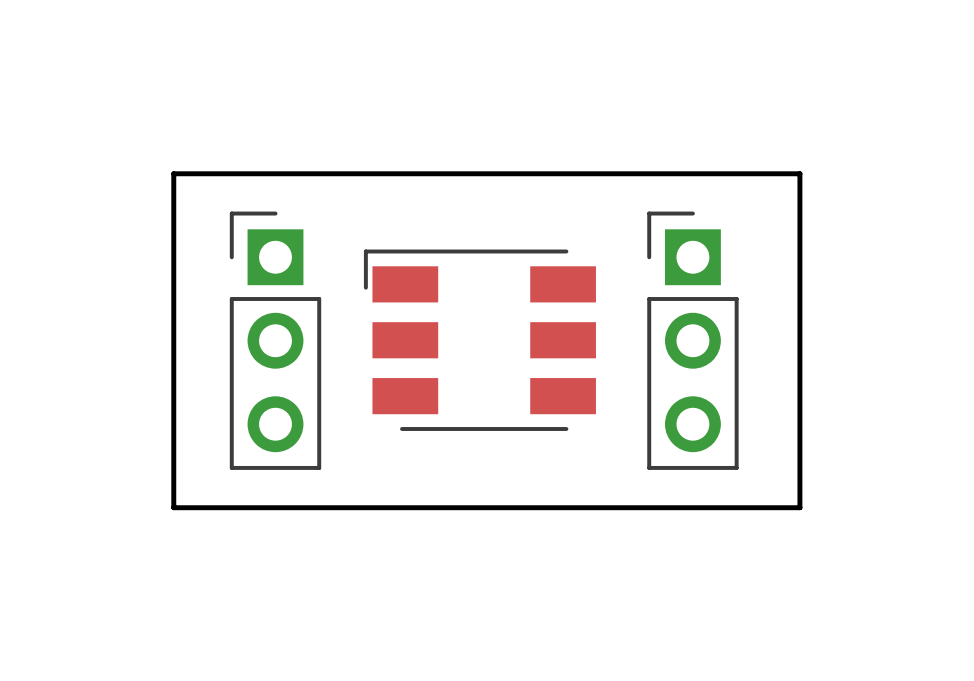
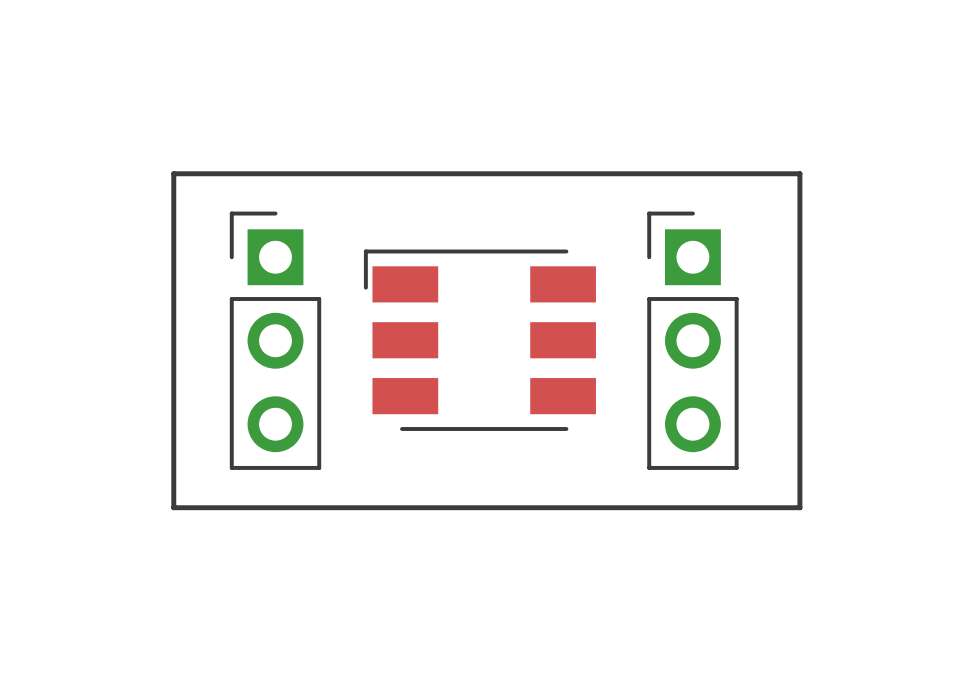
board edge: (173, 173) (799, 173) (799, 507) (173, 507) (173, 173) -> none
line: none -> (173, 173) (799, 173) (799, 507) (173, 507) (173, 173)

